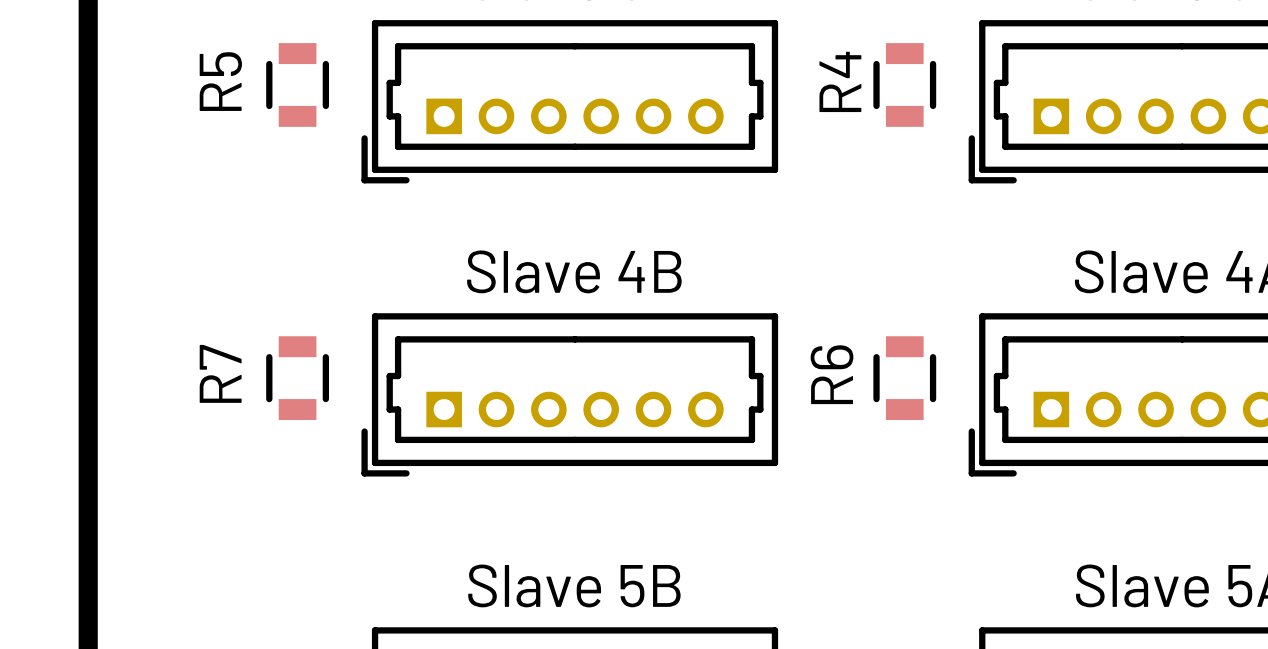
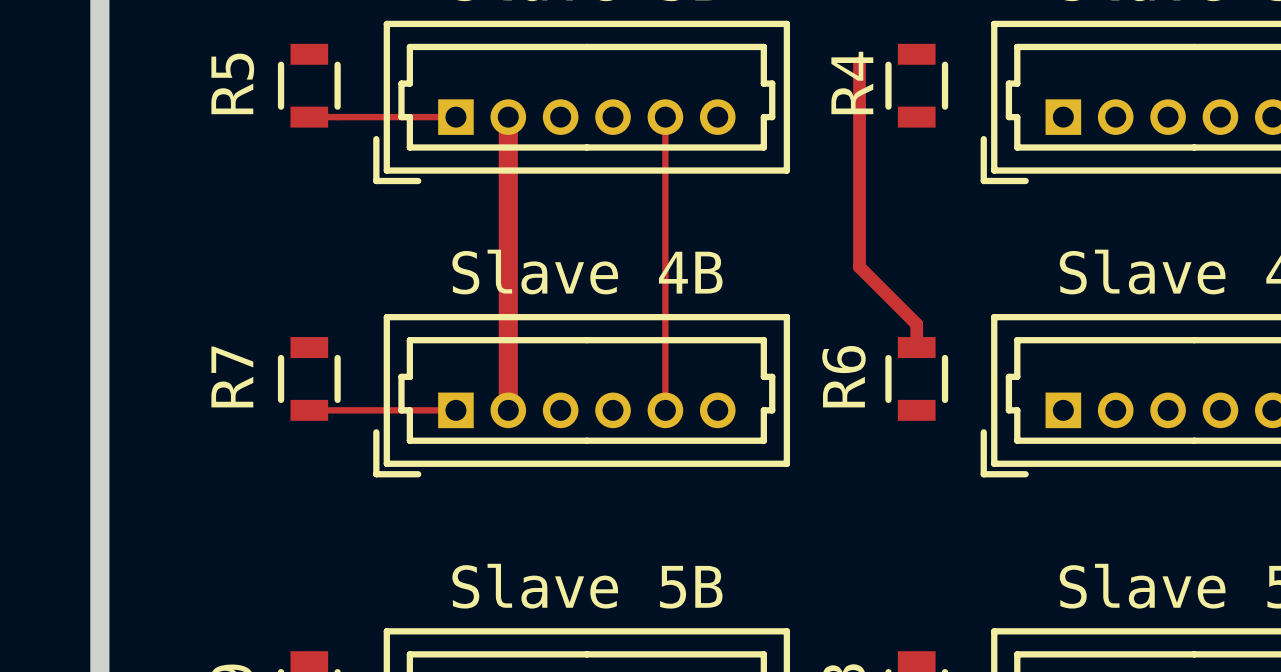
track: none -> (859, 62) (859, 267) (916, 324) (916, 347)
track: none -> (309, 117) (455, 117)
track: none -> (508, 117) (508, 410)
track: none -> (665, 117) (665, 410)
track: none -> (309, 410) (455, 410)

